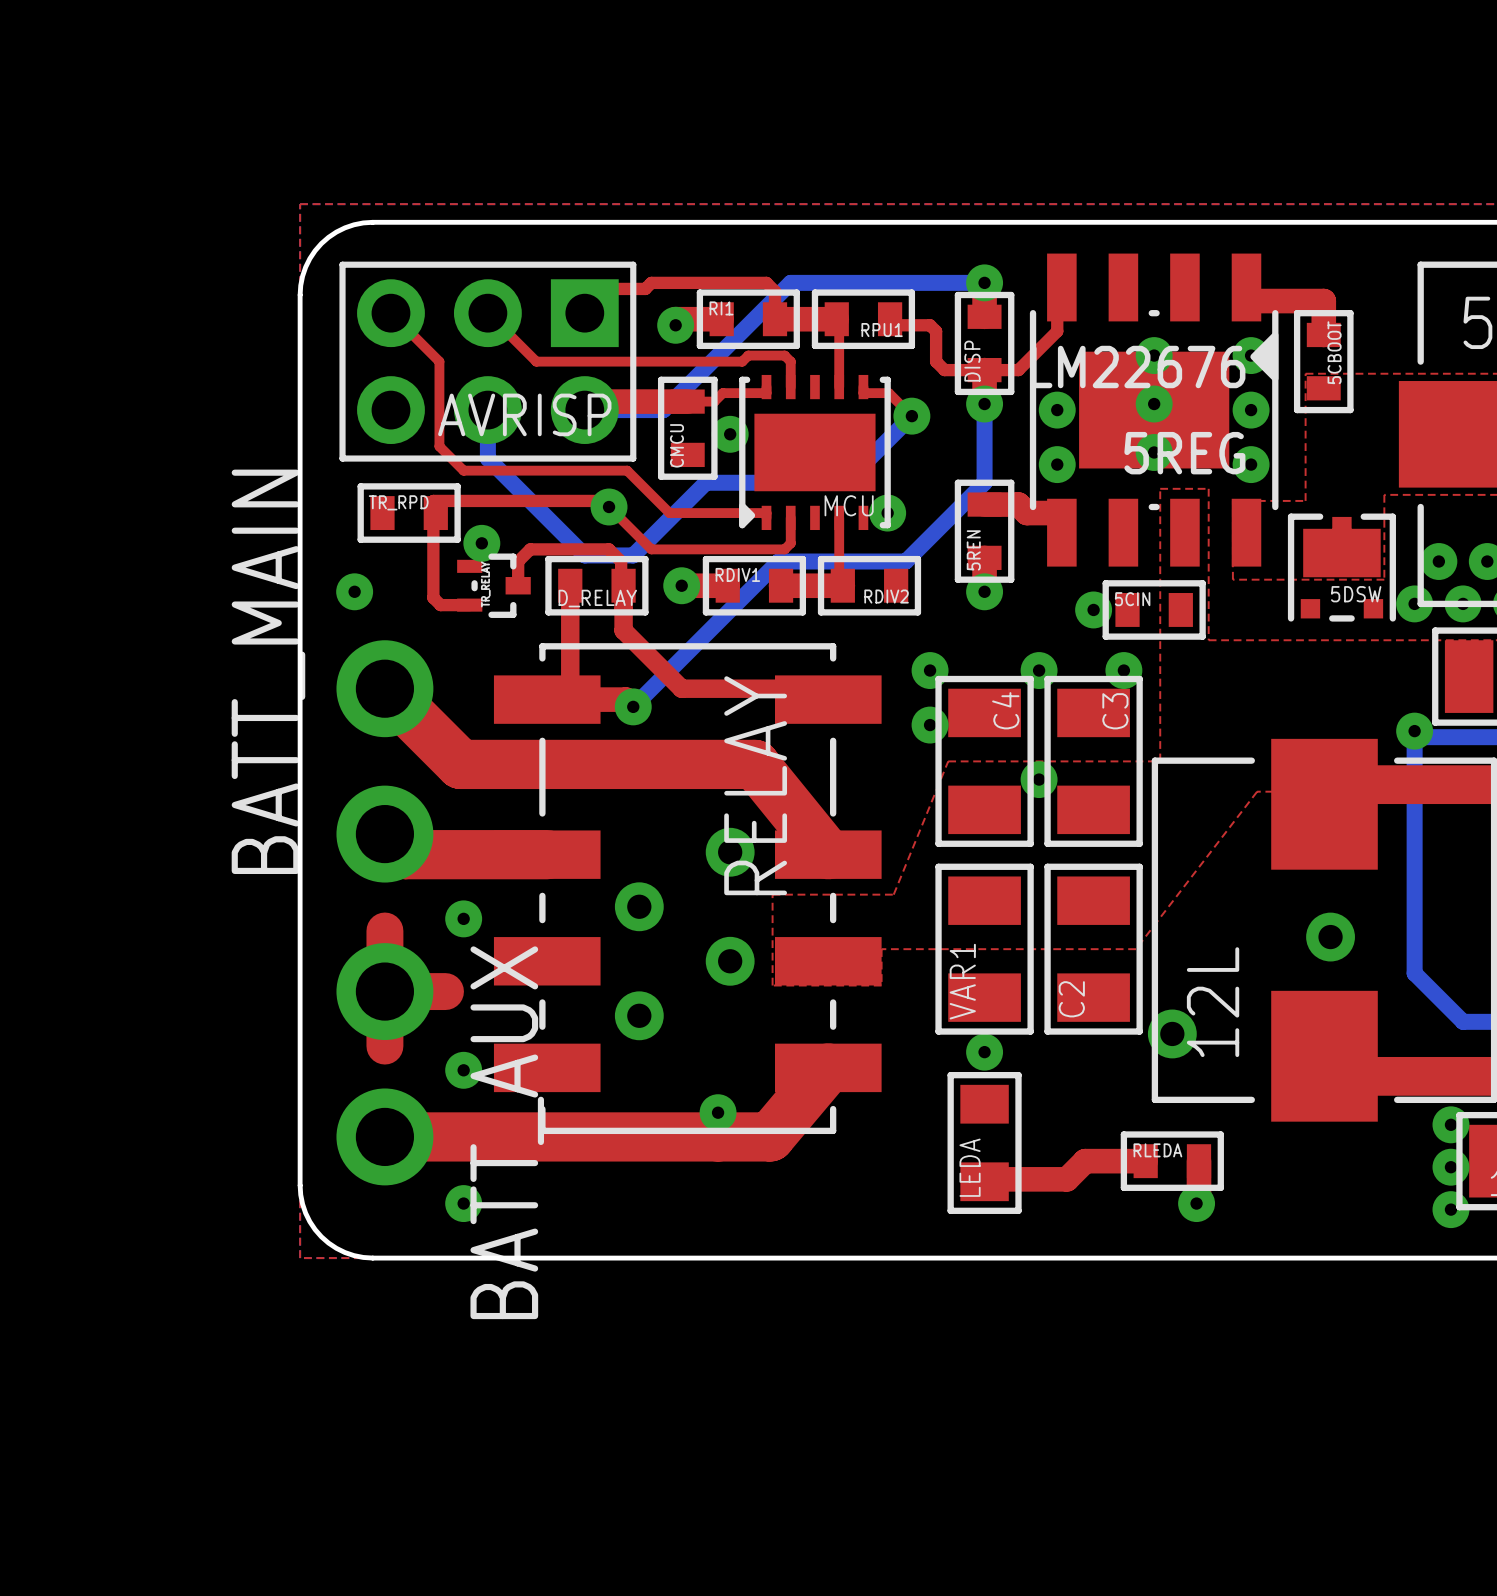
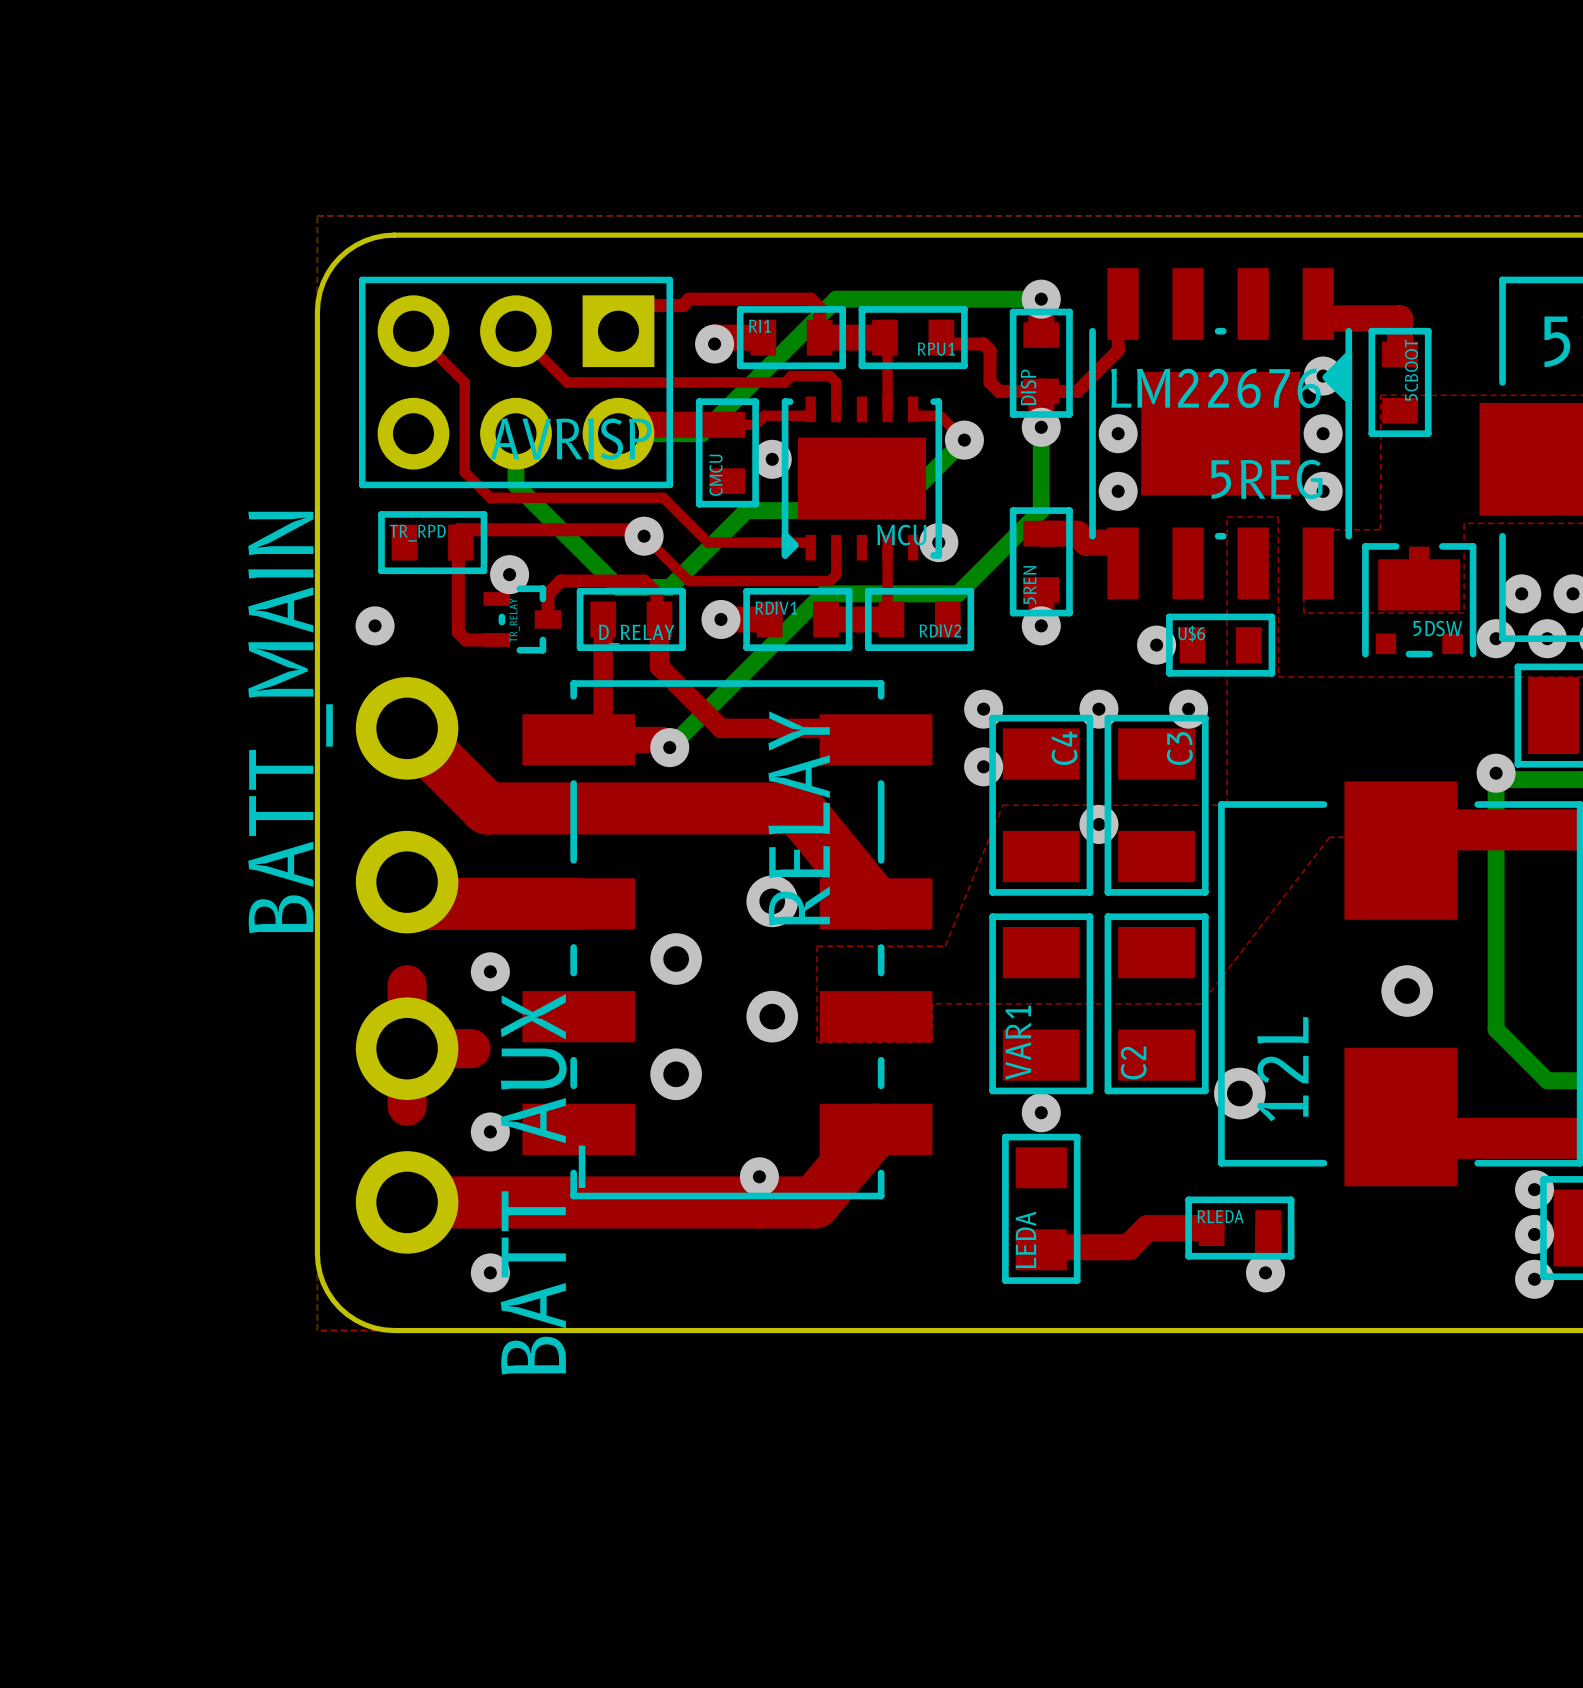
via: (1154, 355) -> none
via: (1154, 404) -> none
via: (1154, 452) -> none
5CIN name: 5CIN (1132, 599) -> U$6 (1191, 633)

